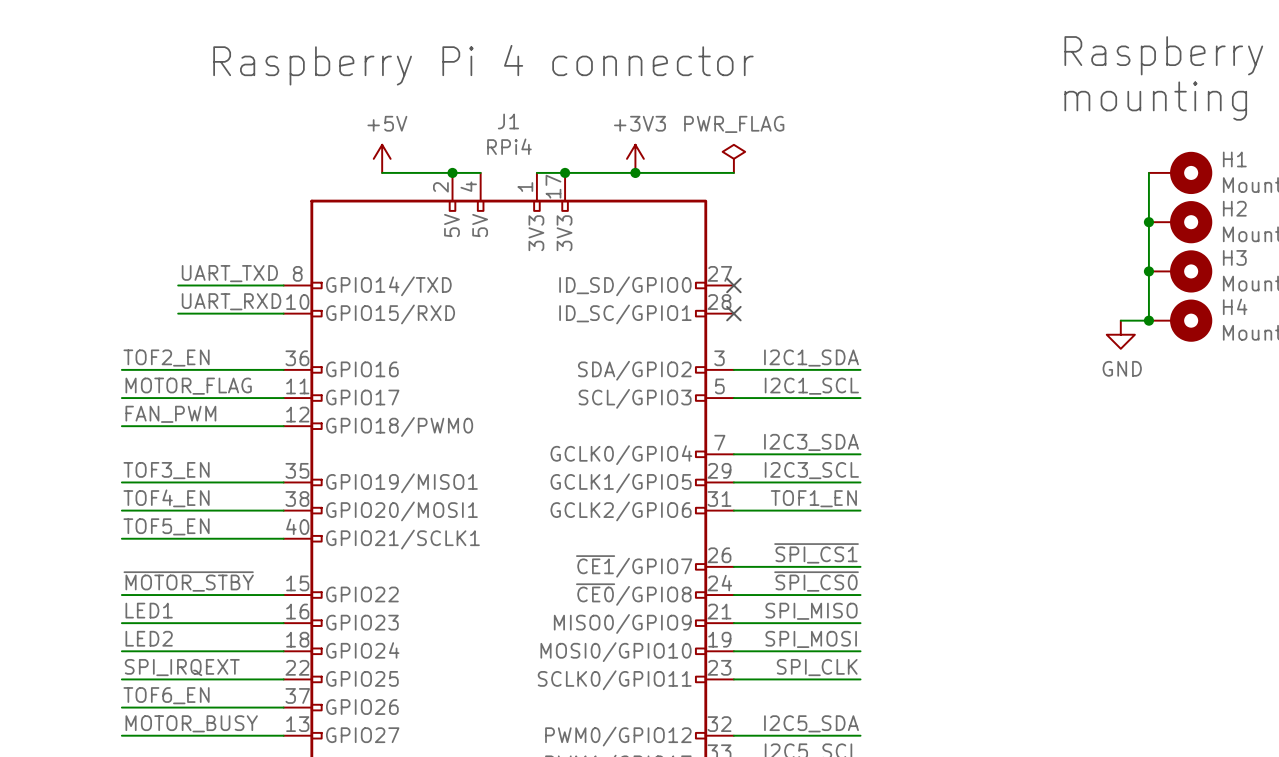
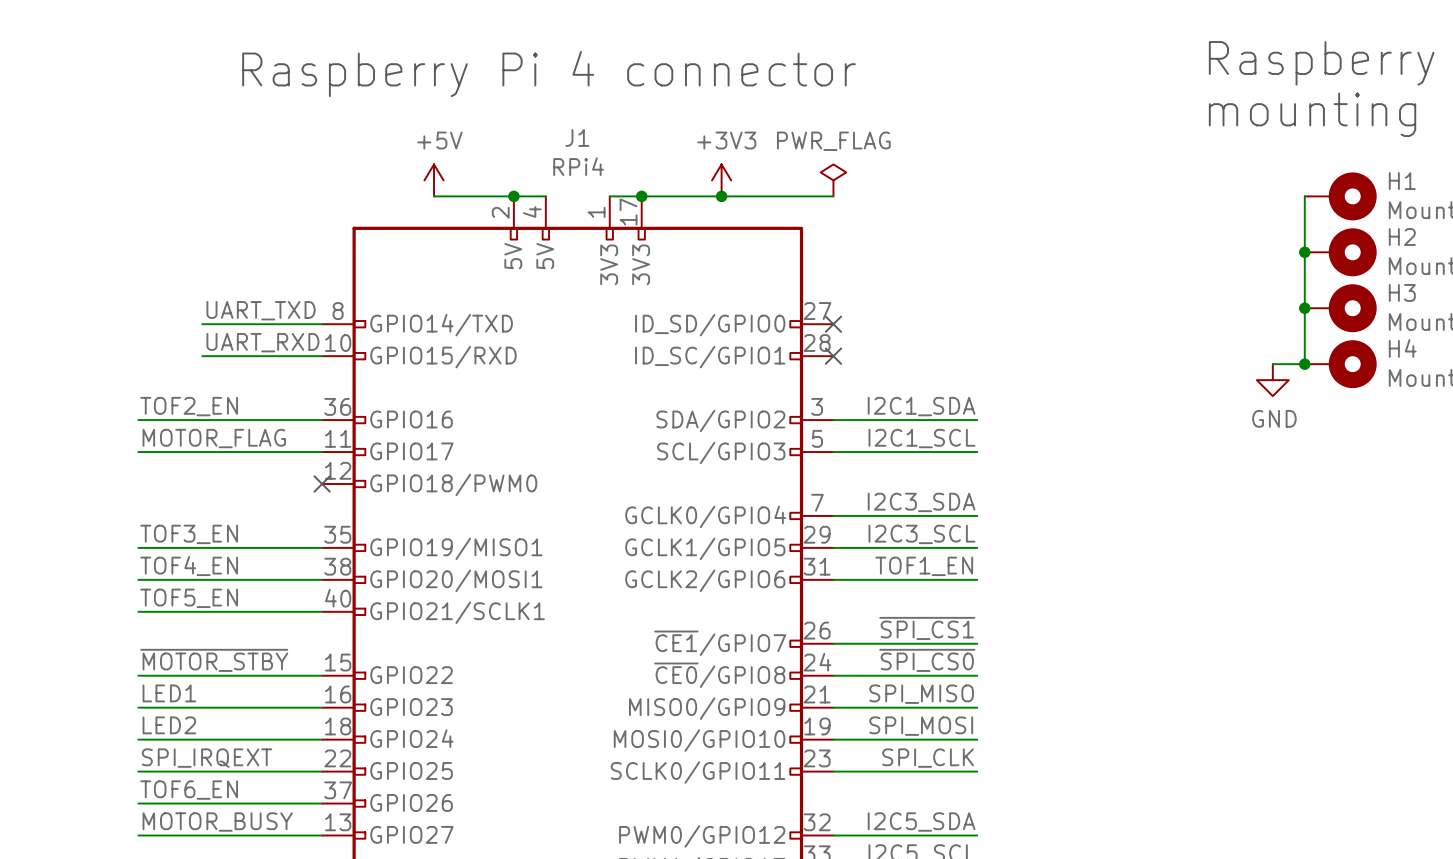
label: FAN_PWM (170, 414) -> none
wire: (121, 426) (283, 426) -> none
no-connect mark: none -> (322, 483)

